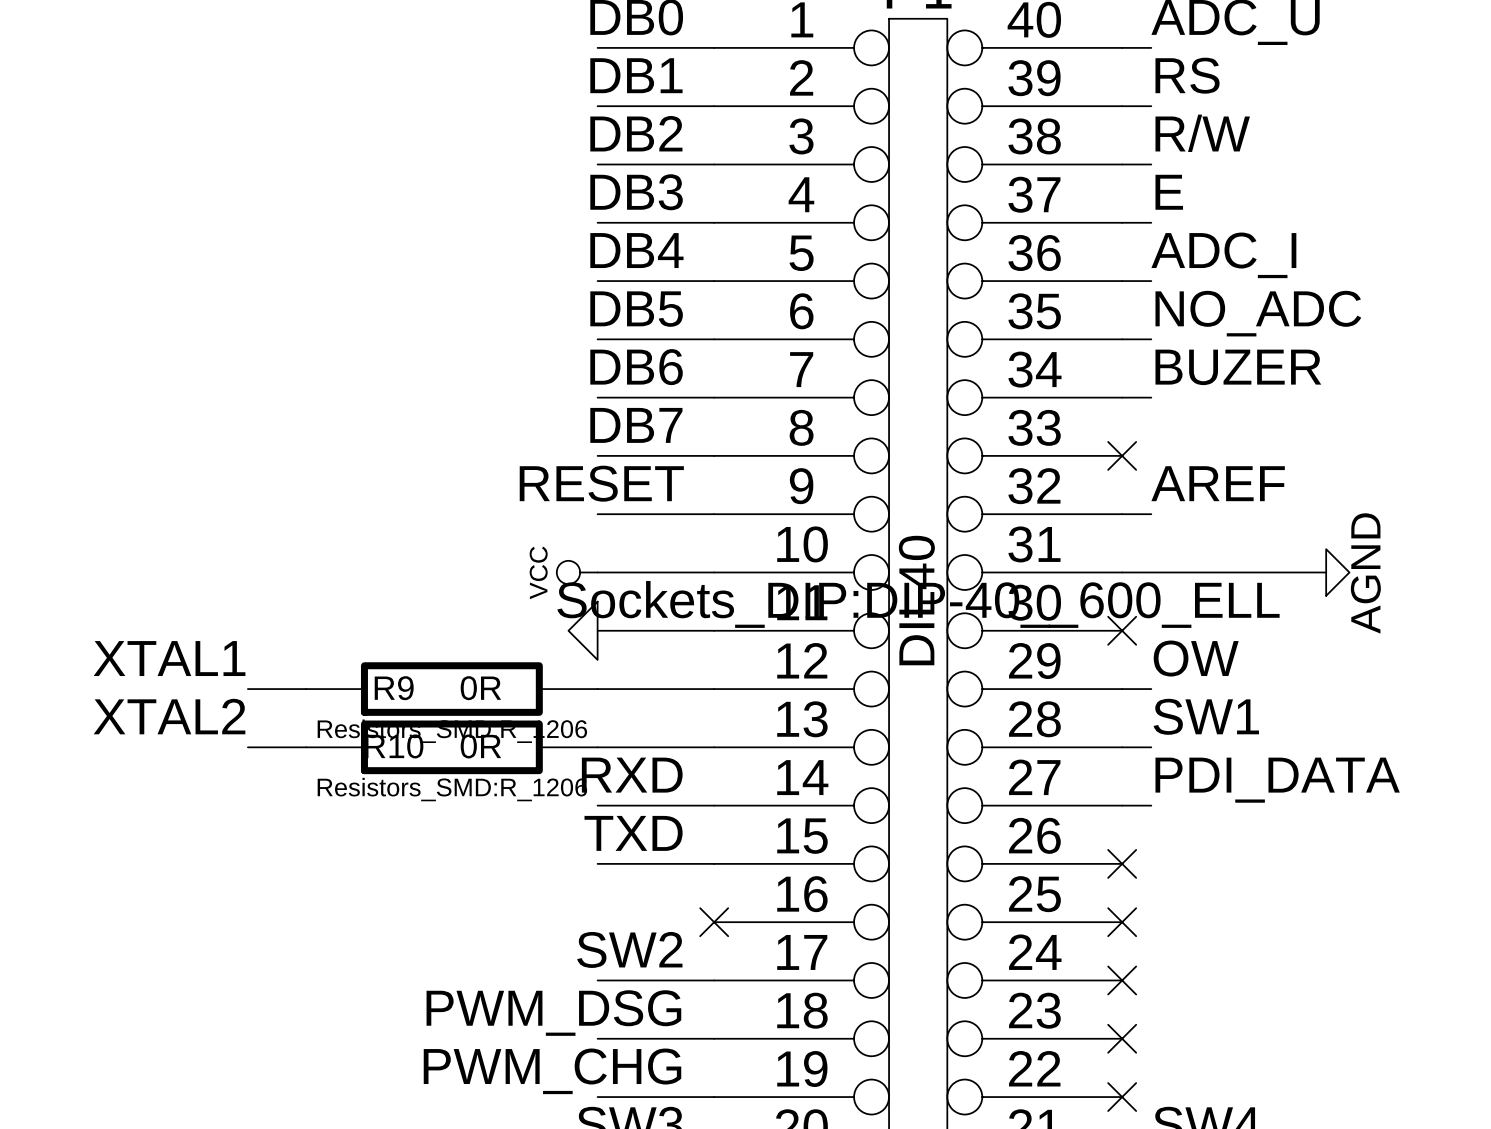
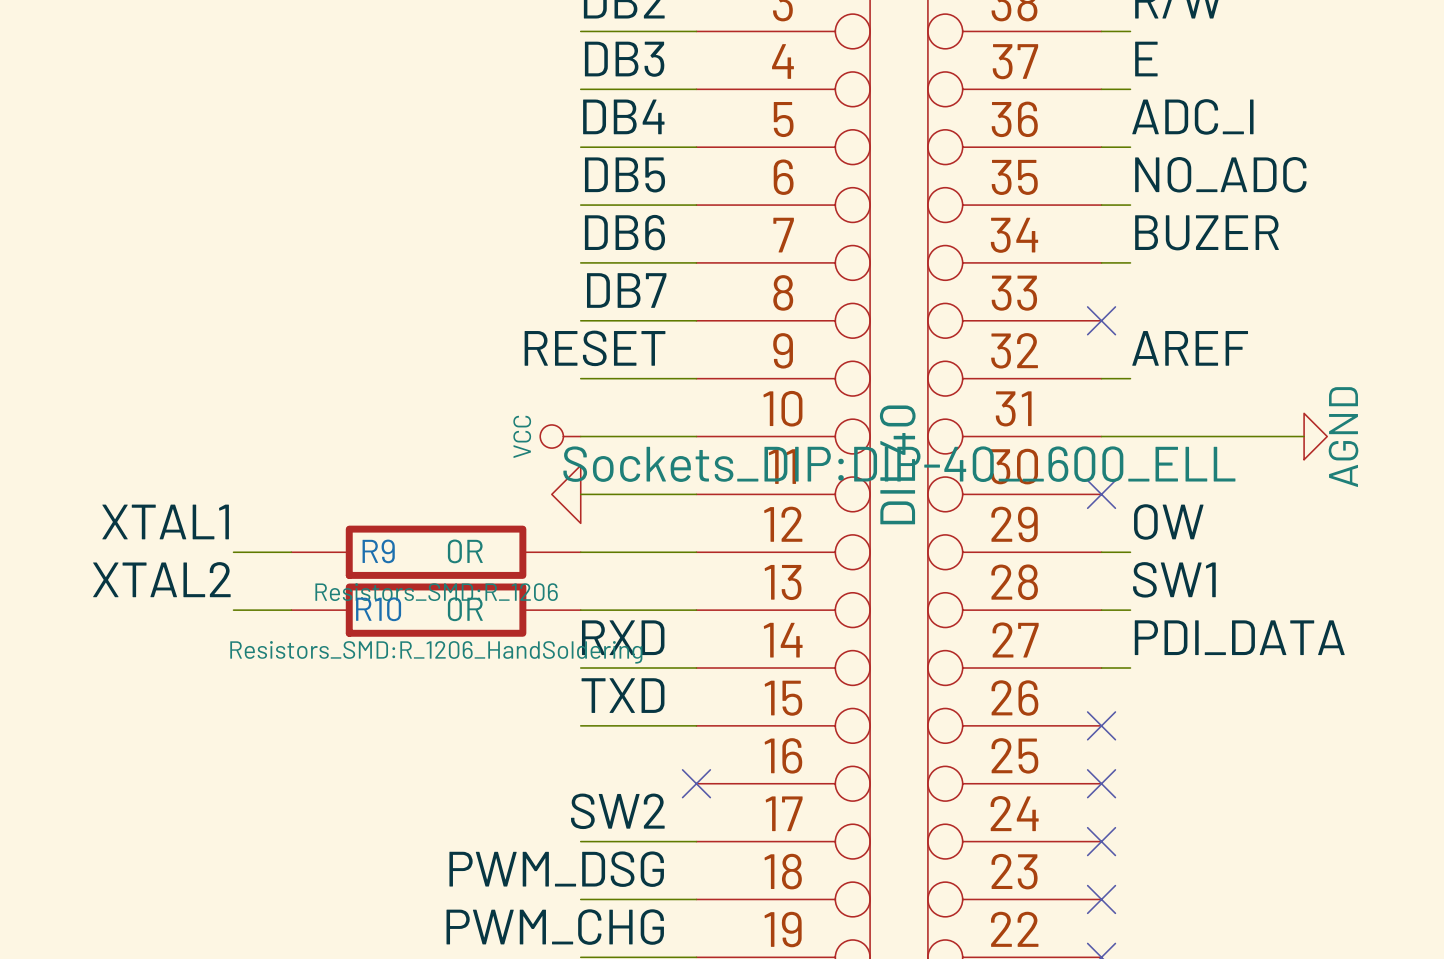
R10 text: Resistors_SMD:R_1206 (452, 789) -> Resistors_SMD:R_1206_HandSoldering (436, 652)

